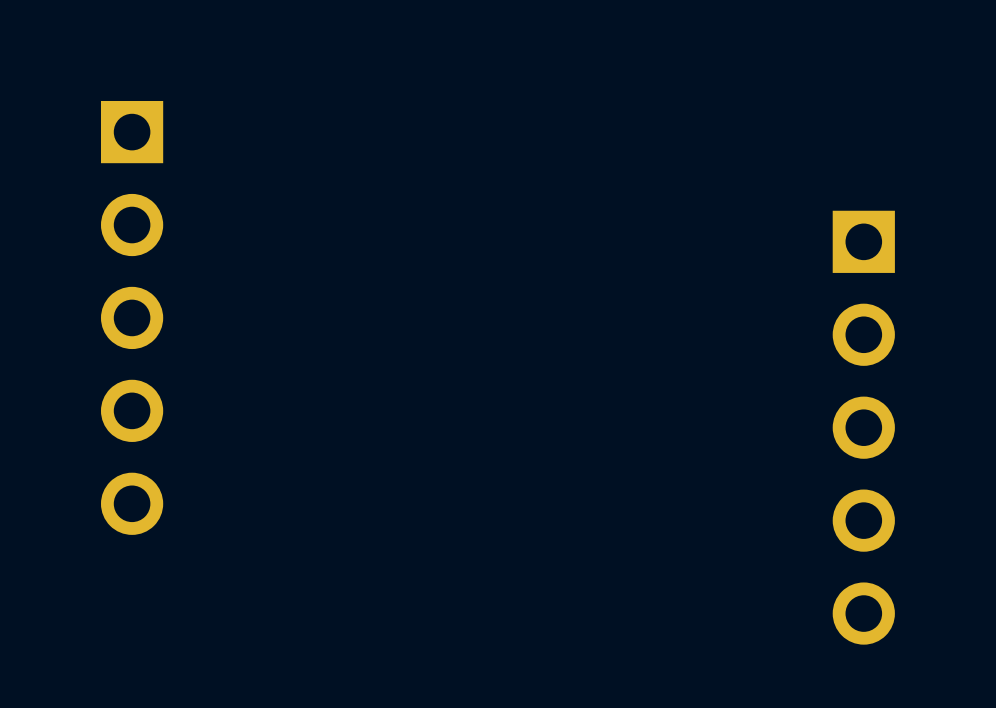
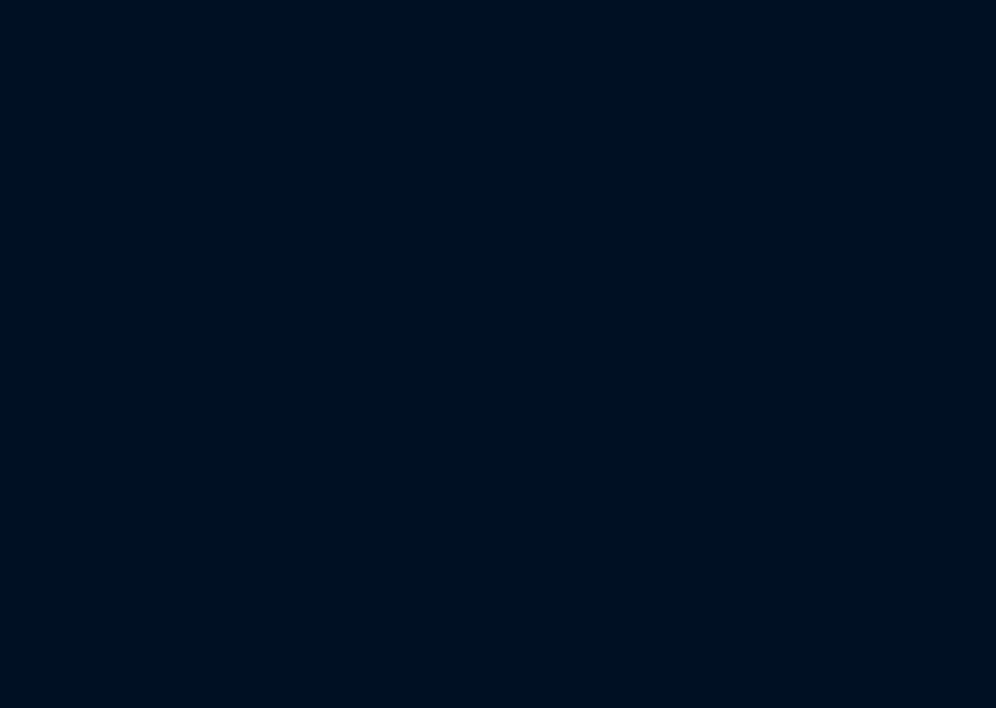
part: (132, 317) -> none
part: (863, 427) -> none

